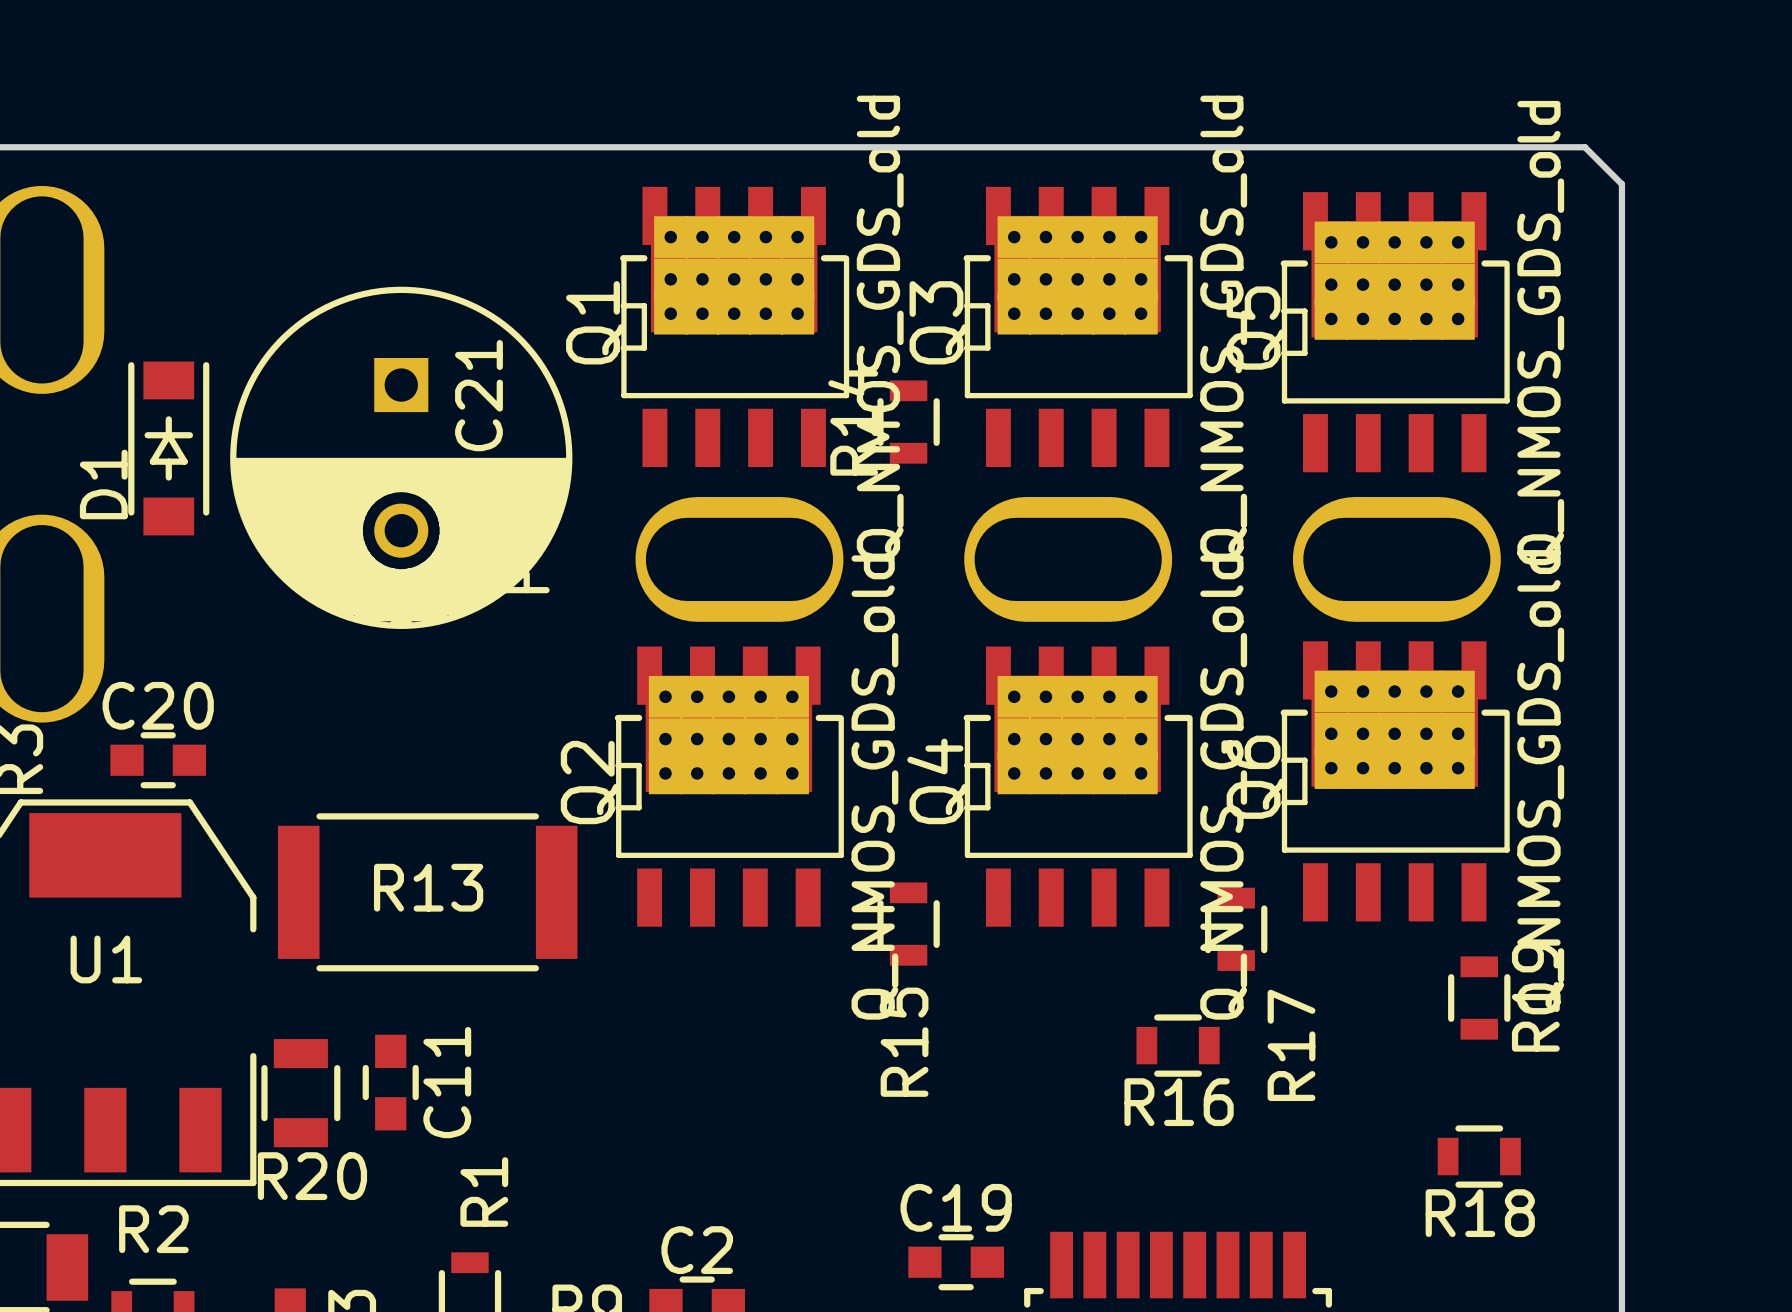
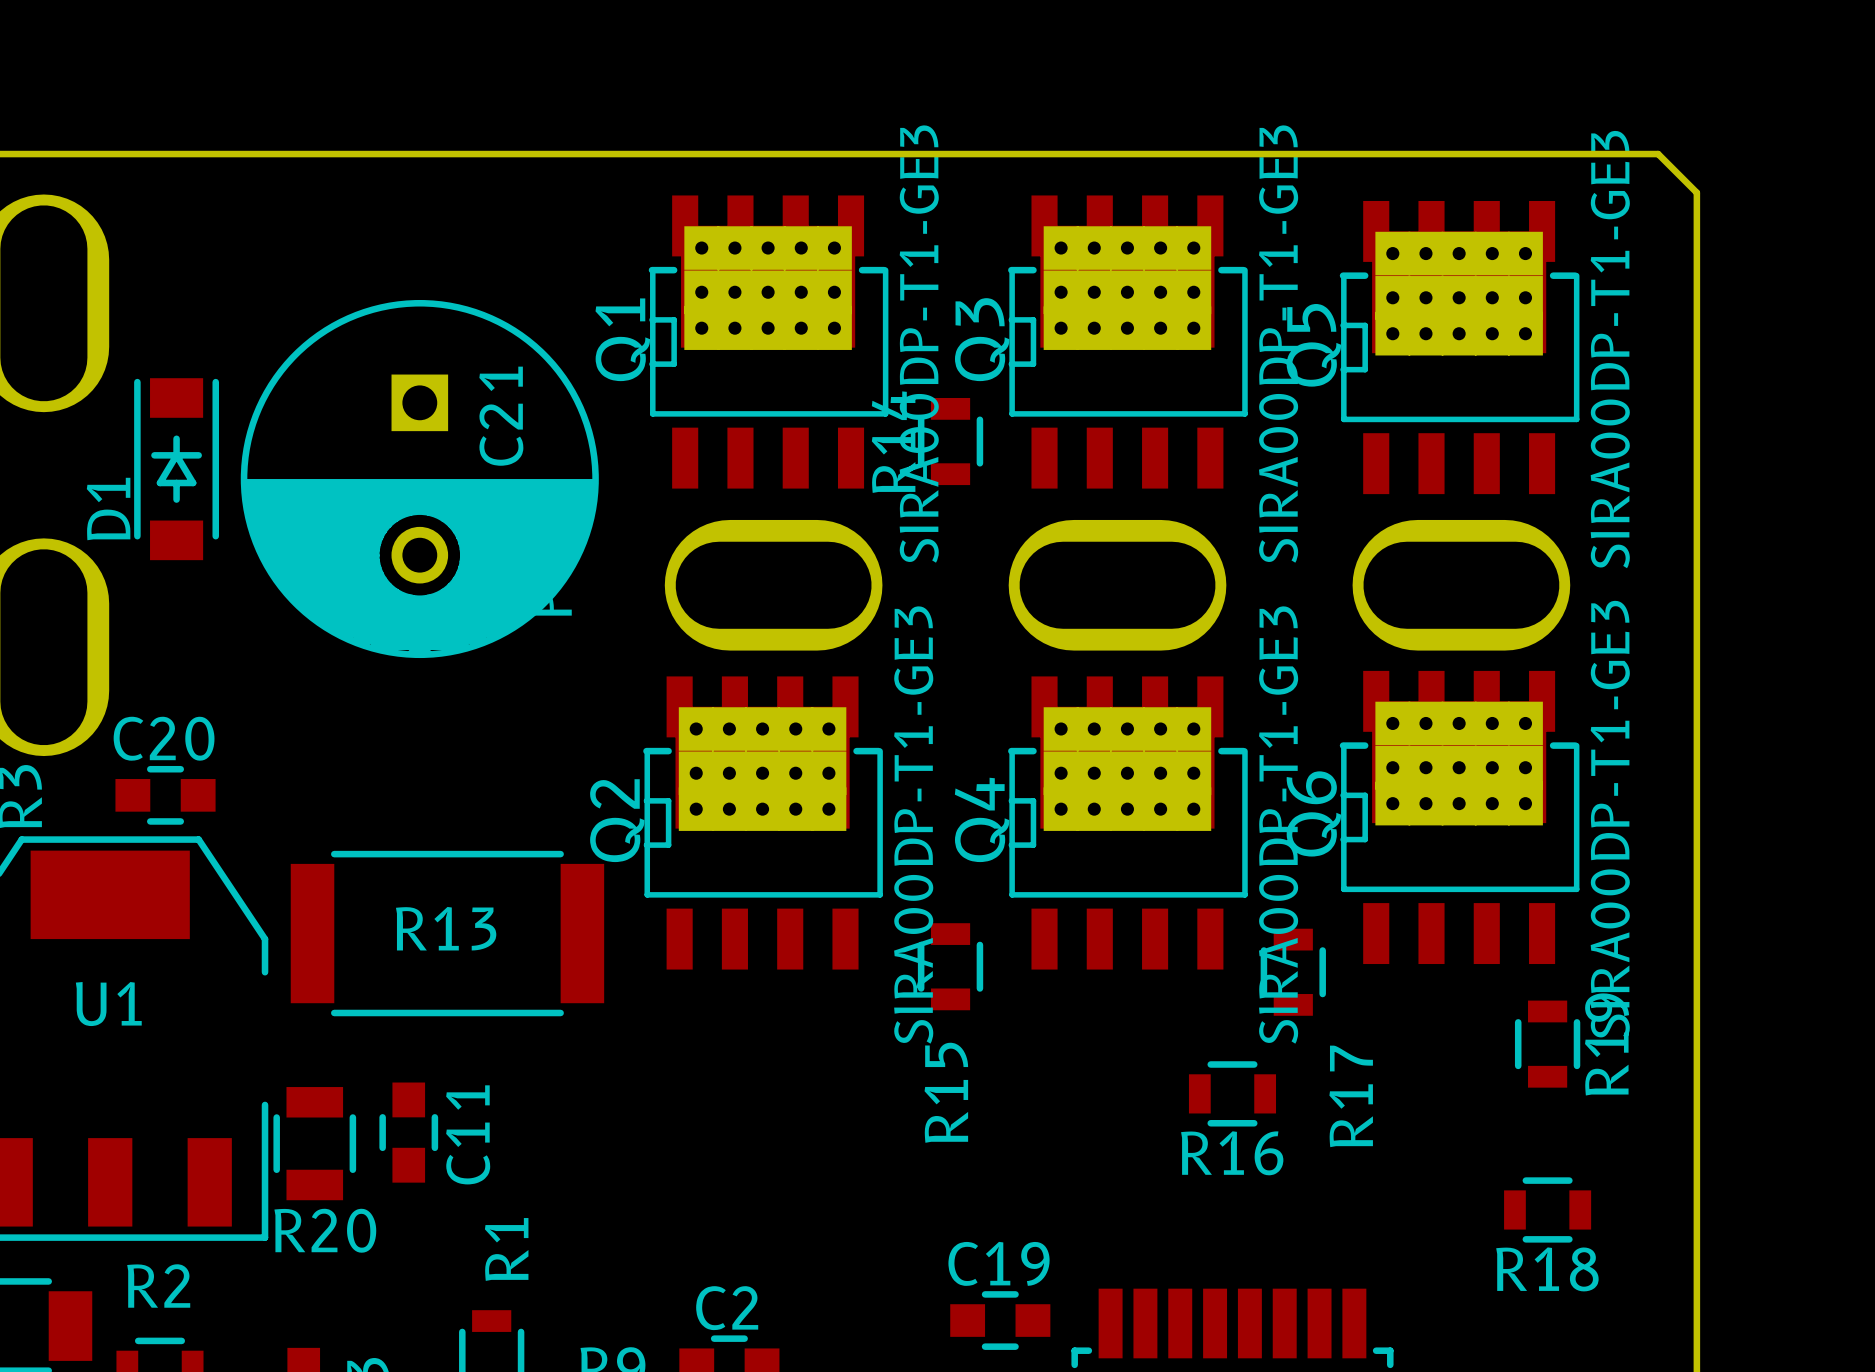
Q1 value: Q_NMOS_GDS_old (880, 327) -> SIRA00DP-T1-GE3 (919, 344)
Q3 value: Q_NMOS_GDS_old (1223, 327) -> SIRA00DP-T1-GE3 (1278, 344)
Q5 value: Q_NMOS_GDS_old (1540, 333) -> SIRA00DP-T1-GE3 (1610, 349)
Q6 value: Q_NMOS_GDS_old (1540, 782) -> SIRA00DP-T1-GE3 (1610, 819)
Q2 value: Q_NMOS_GDS_old (874, 787) -> SIRA00DP-T1-GE3 (913, 825)
Q4 value: Q_NMOS_GDS_old (1223, 787) -> SIRA00DP-T1-GE3 (1278, 825)

